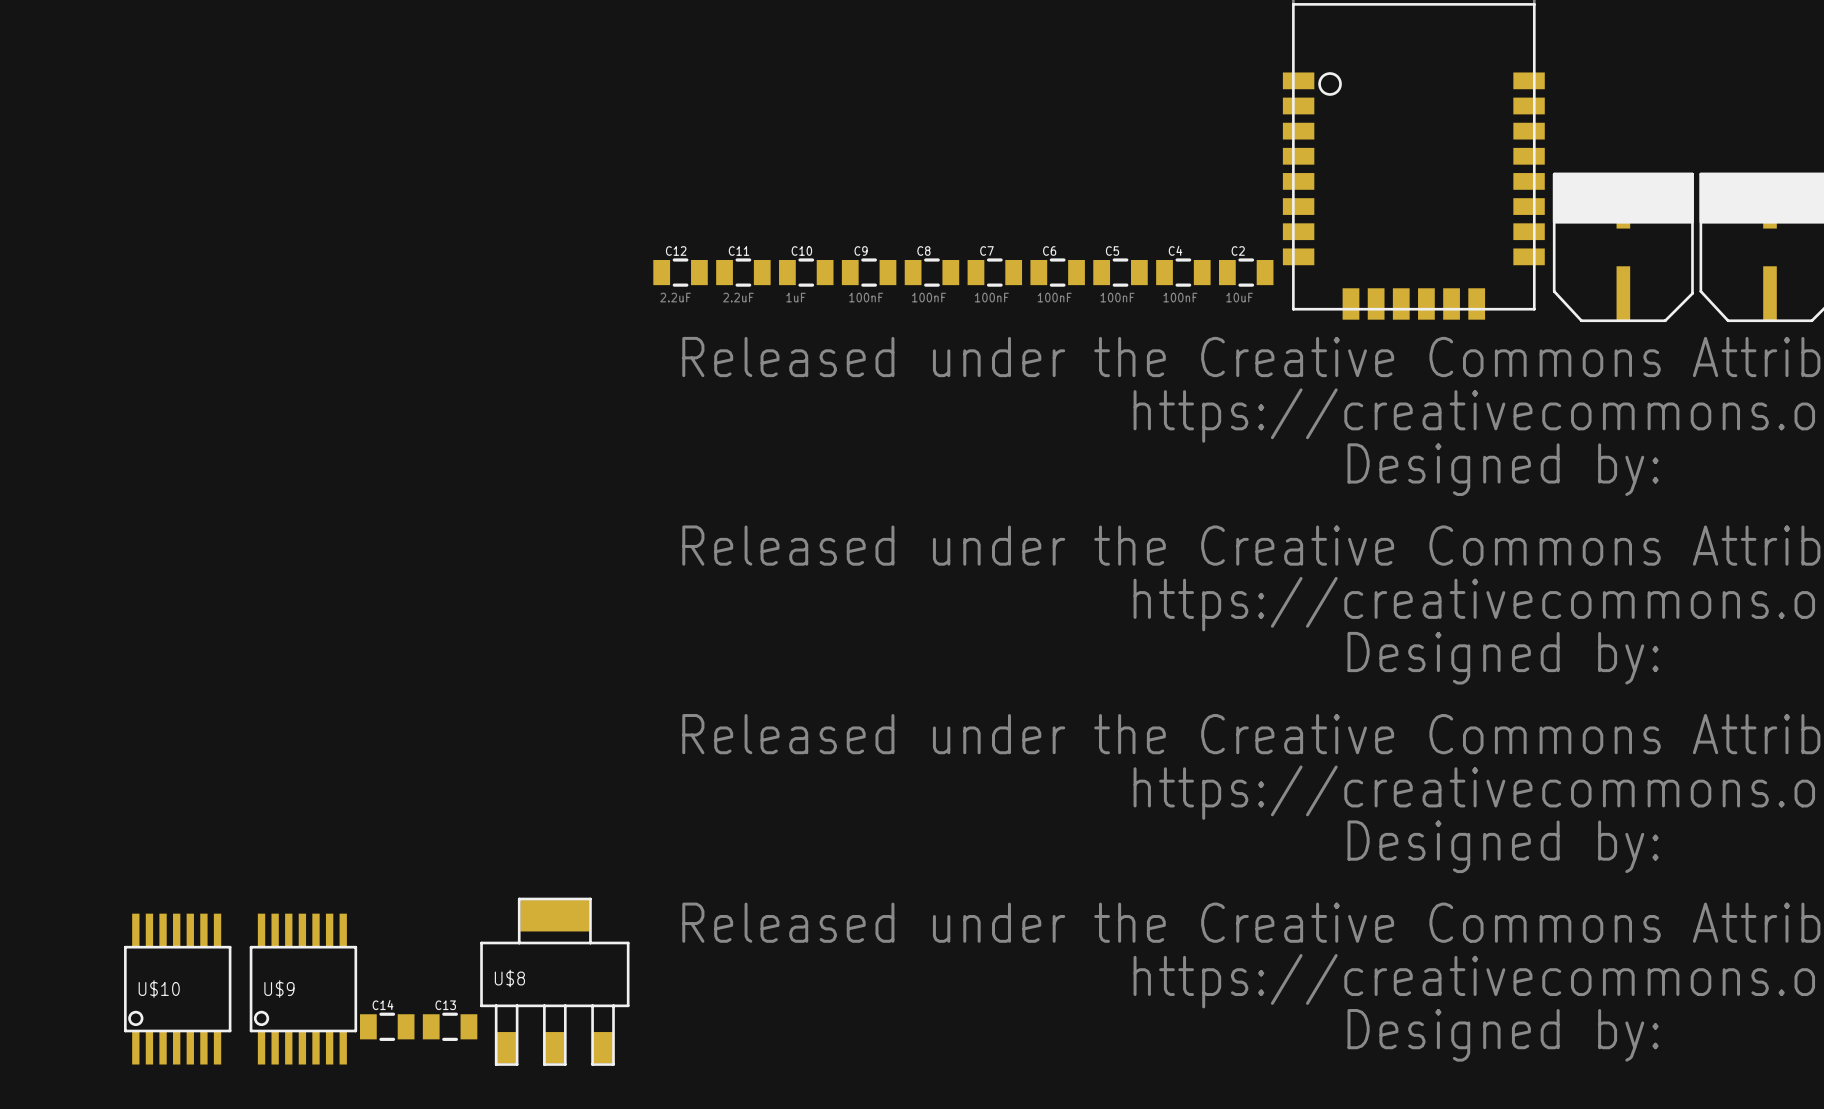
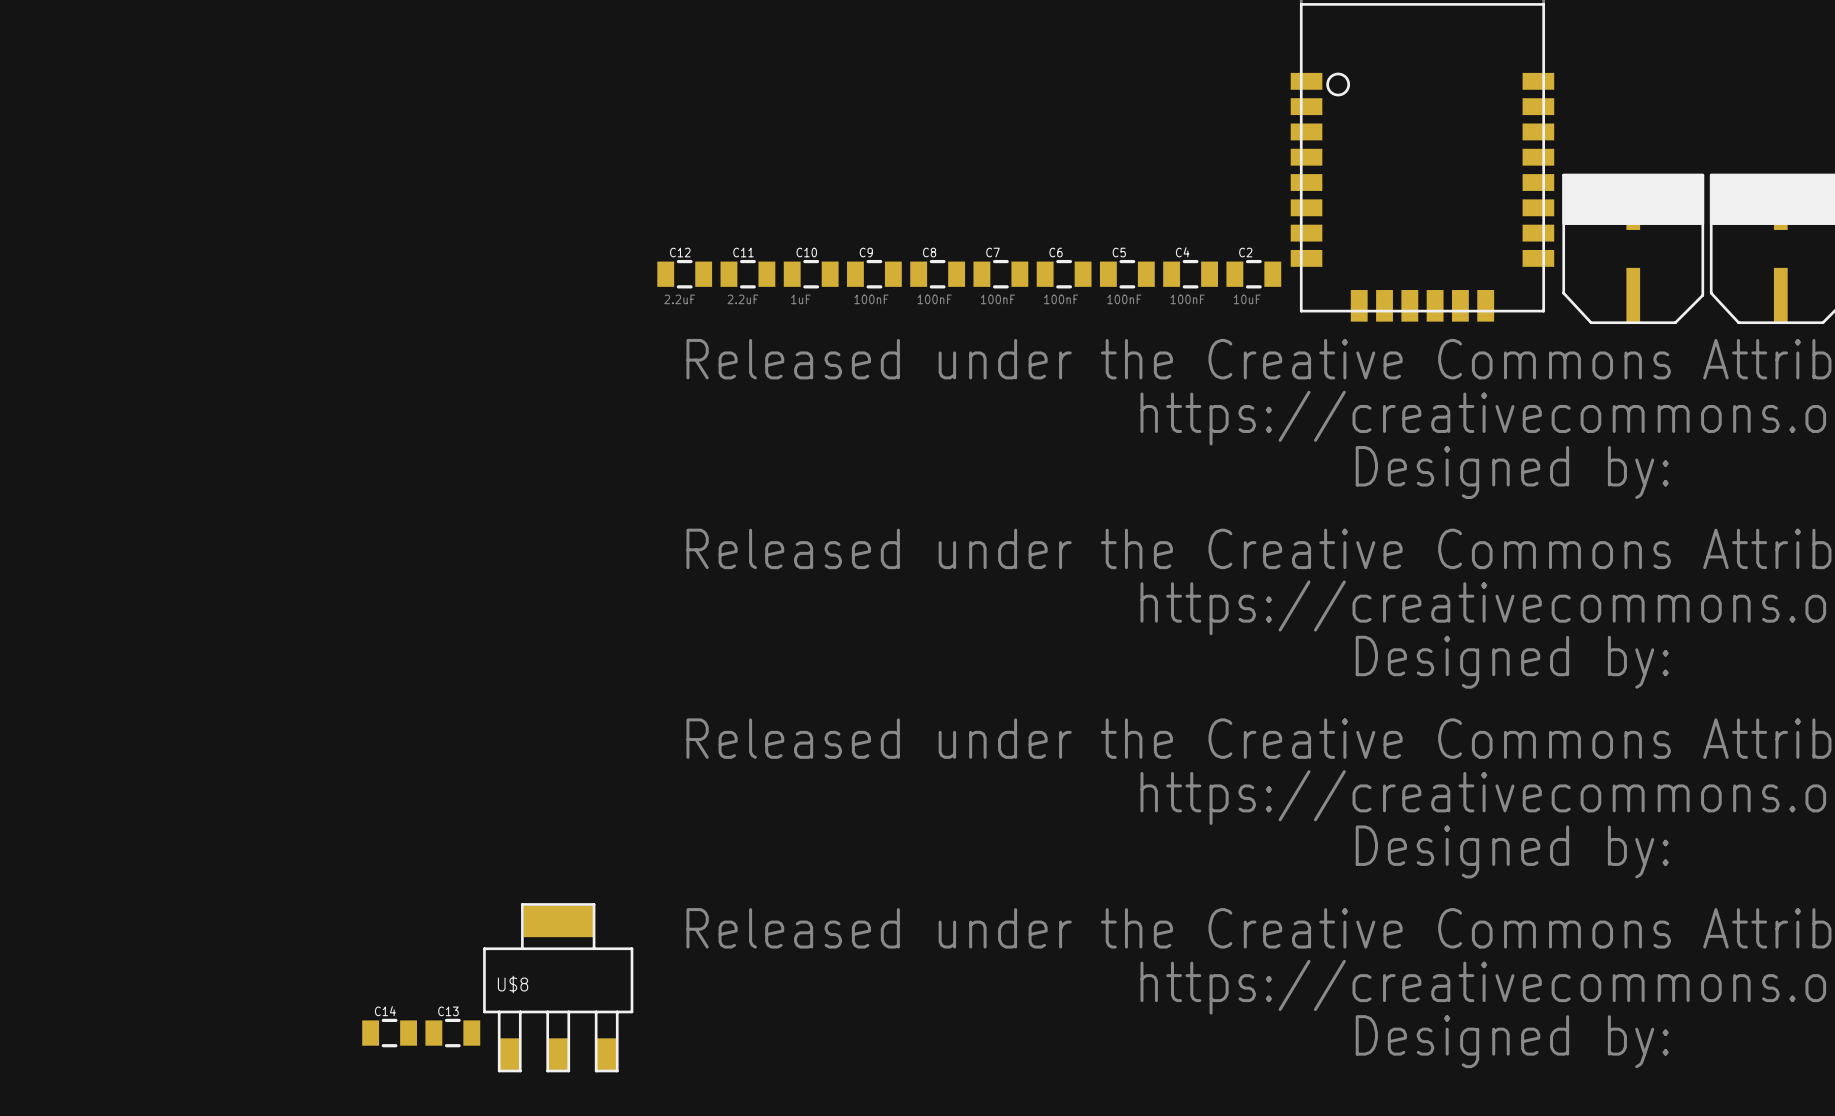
U$10: (177, 989) -> none
U$9: (303, 989) -> none

